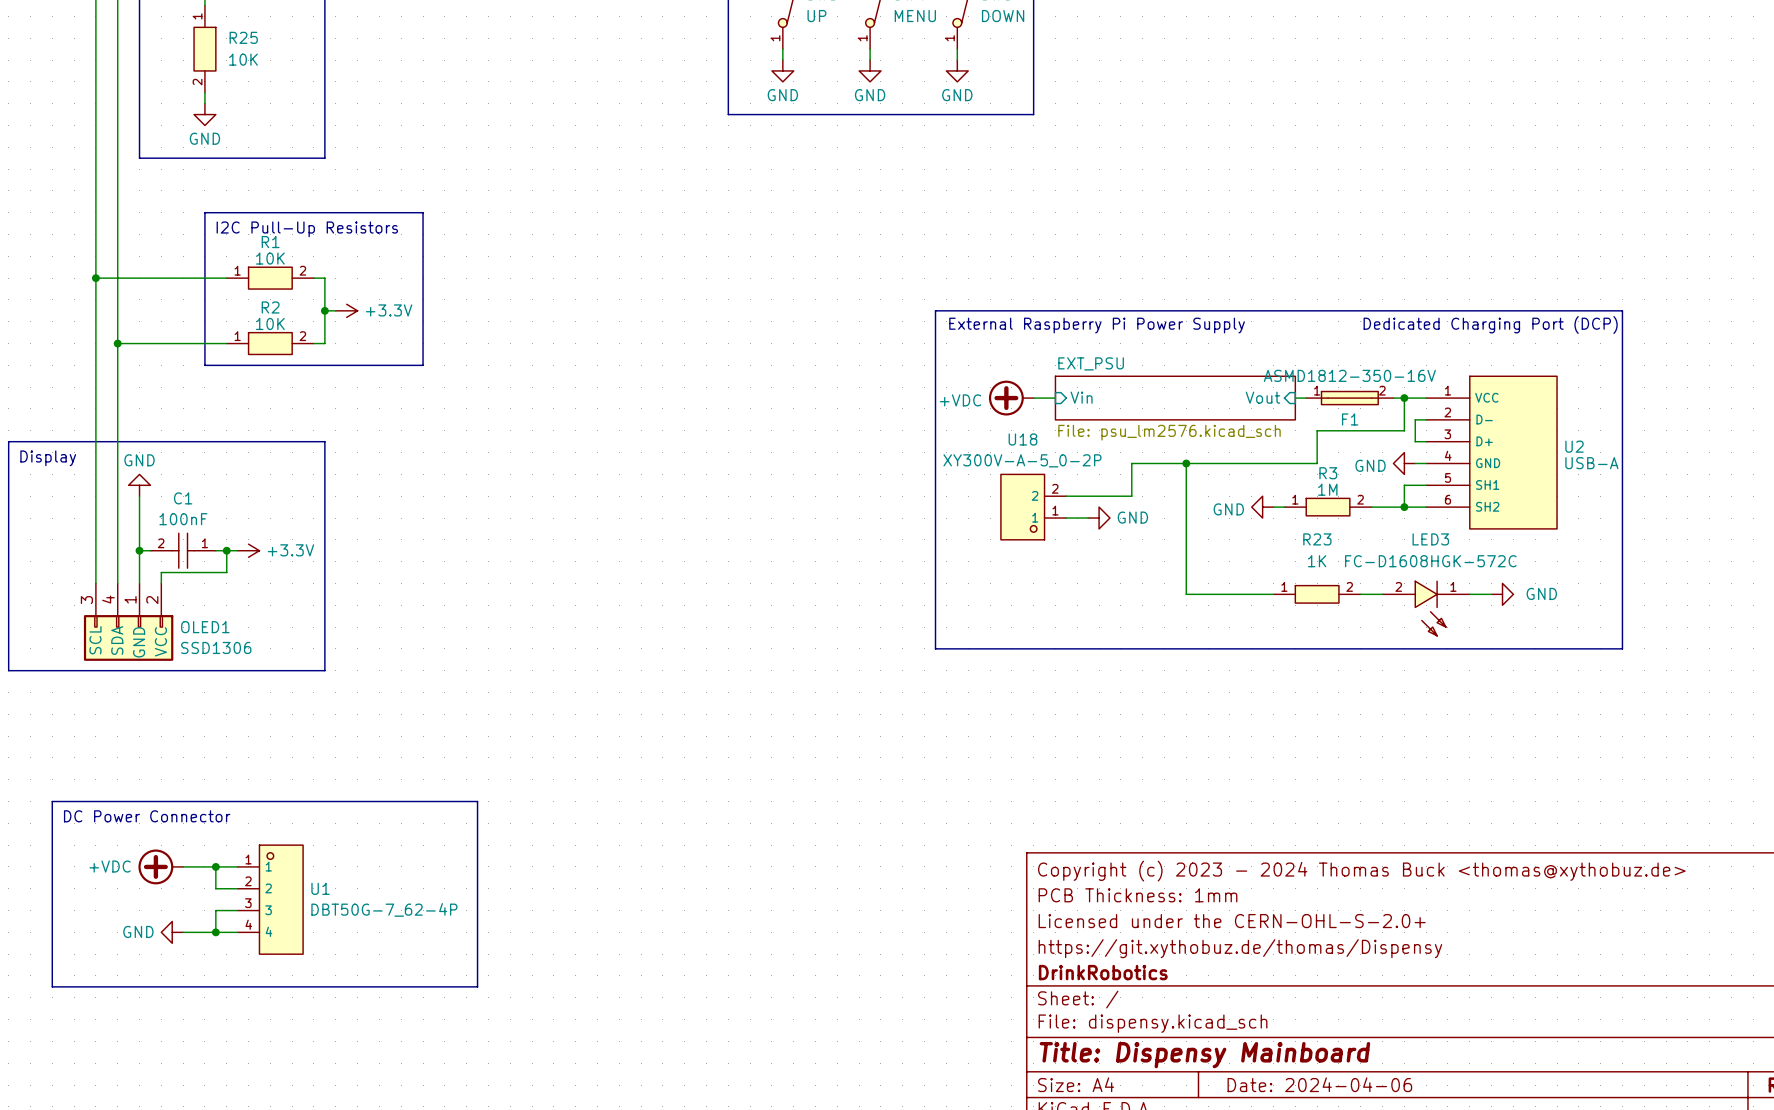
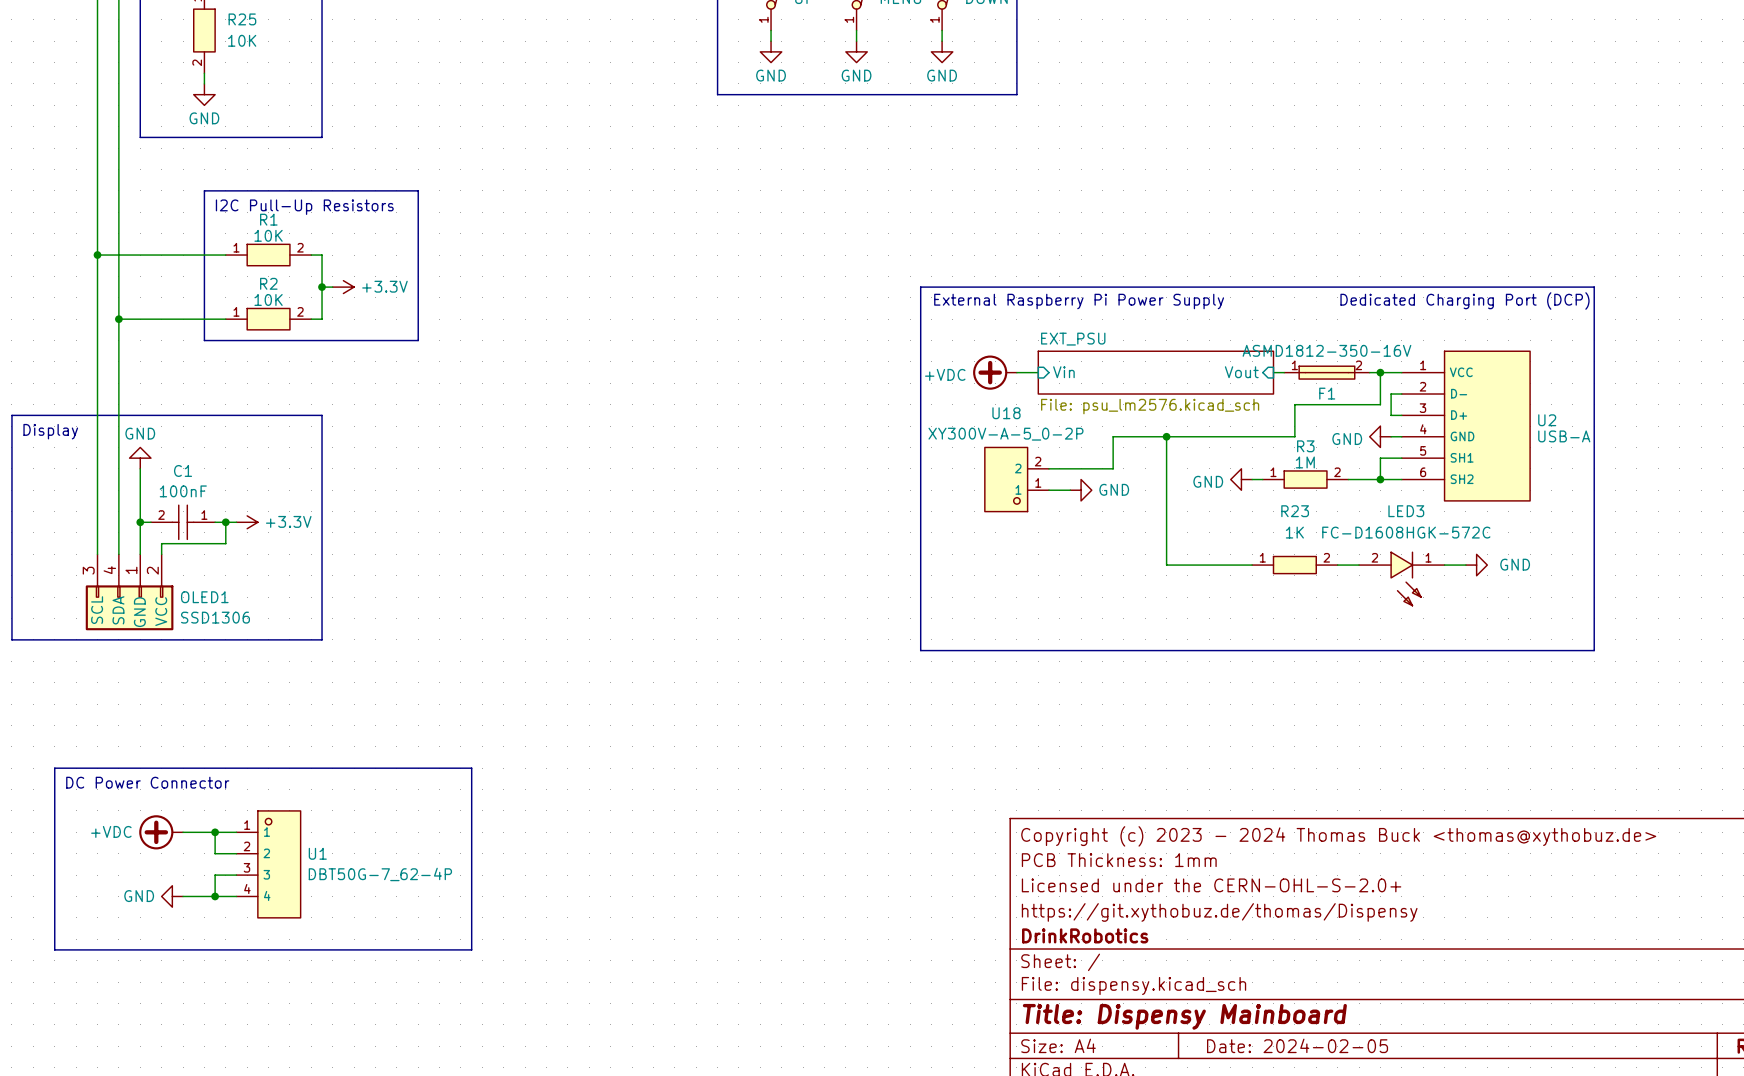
line: (935, 648) (1622, 648) -> (920, 618) (920, 650) (1594, 650) (1594, 618)
title block: Date: 2024-04-06 (1319, 1084) -> Date: 2024-02-05 (1297, 1045)

